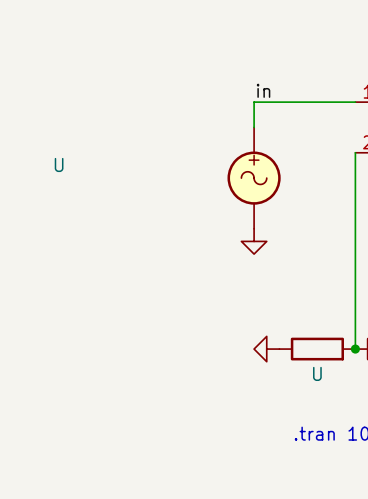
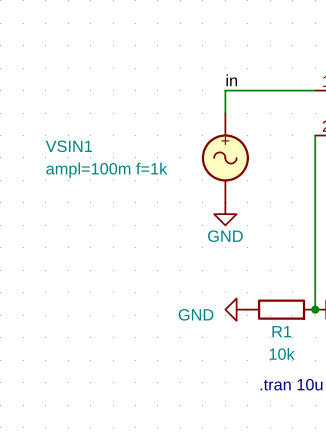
U name: U (59, 164) -> VSIN1 (68, 146)
U value: none -> ampl=100m f=1k (106, 170)
power symbol text: none -> GND (225, 236)
power symbol text: none -> GND (196, 314)
U name: U (317, 373) -> R1 (281, 331)
U value: none -> 10k (282, 353)

